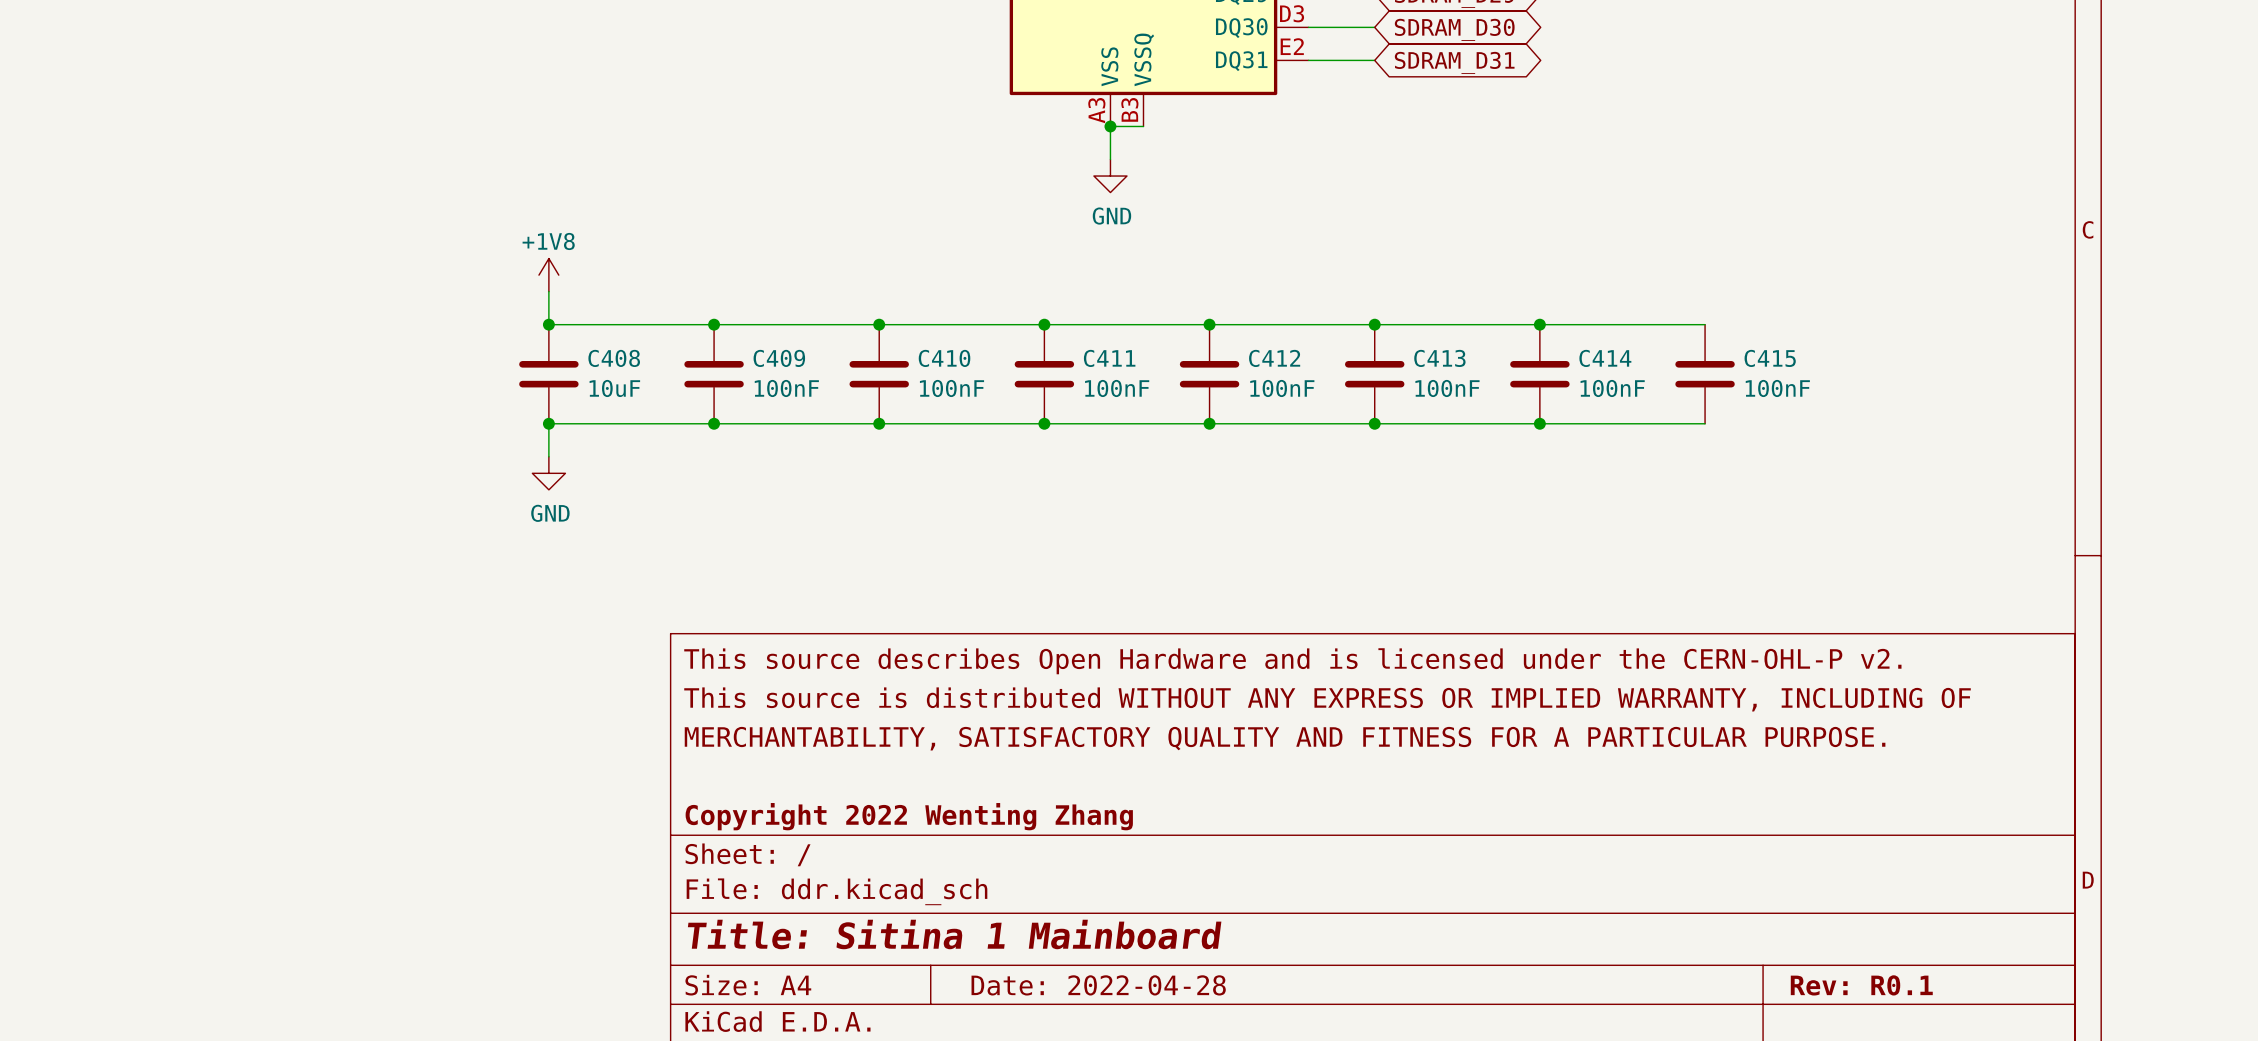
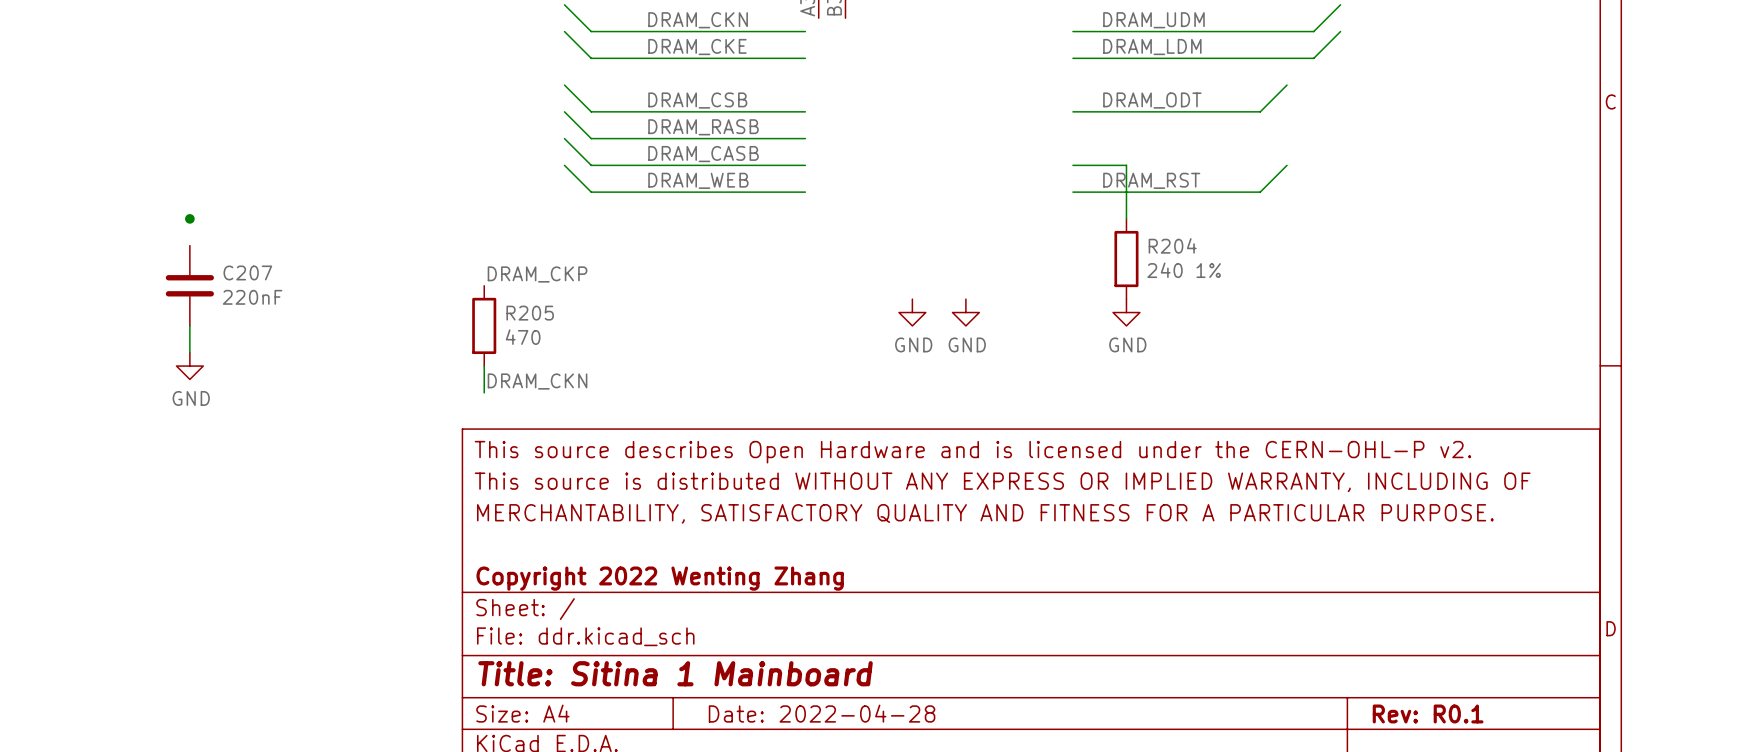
wire: none -> (564, 4) (591, 31) (805, 31)
wire: none -> (1340, 4) (1313, 31) (1072, 31)
junction: (1110, 126) -> none
wire: (1143, 126) (1110, 126) (1110, 159) -> none
label: none -> DRAM_CKN (698, 20)
label: none -> DRAM_UDM (1153, 20)
wire: none -> (564, 31) (591, 58) (805, 58)
wire: none -> (1340, 31) (1313, 58) (1072, 58)
label: none -> DRAM_CKE (697, 47)
label: none -> DRAM_LDM (1152, 47)
power symbol: GND (1110, 176) -> none
wire: none -> (564, 85) (591, 111) (805, 111)
wire: none -> (1287, 85) (1260, 111) (1072, 111)
label: none -> DRAM_CSB (697, 100)
label: none -> DRAM_ODT (1152, 100)
wire: none -> (564, 111) (591, 138) (805, 138)
label: none -> DRAM_RASB (703, 127)
power symbol: +1V8 (548, 275) -> none
wire: none -> (564, 138) (591, 165) (805, 165)
wire: (548, 291) (548, 324) (1705, 324) -> none
label: none -> DRAM_CASB (703, 154)
wire: none -> (564, 165) (591, 192) (805, 192)
wire: none -> (1072, 165) (1126, 165) (1126, 218)
wire: none -> (1287, 165) (1260, 192) (1072, 192)
junction: (548, 324) -> none
junction: (714, 324) -> none
junction: (879, 324) -> none
junction: (1044, 324) -> none
junction: (1209, 324) -> none
junction: (1374, 324) -> none
junction: (1539, 324) -> none
label: none -> DRAM_RST (1151, 180)
label: none -> DRAM_WEB (698, 180)
junction: none -> (189, 218)
C408: 10uF (548, 374) -> none
C409: 100nF (714, 374) -> none
C410: 100nF (879, 374) -> none
C411: 100nF (1044, 374) -> none
C412: 100nF (1209, 374) -> none
C413: 100nF (1374, 374) -> none
C414: 100nF (1539, 374) -> none
C415: 100nF (1705, 374) -> none
junction: (548, 423) -> none
junction: (714, 423) -> none
junction: (879, 423) -> none
junction: (1044, 423) -> none
junction: (1209, 423) -> none
junction: (1374, 423) -> none
R204: none -> 240 1% (1126, 259)
junction: (1539, 423) -> none
wire: (1705, 423) (548, 423) (548, 456) -> none
label: none -> DRAM_CKP (537, 274)
C207: none -> 220nF (189, 285)
power symbol position: GND (548, 473) -> GND (189, 366)
power symbol: none -> GND (912, 312)
power symbol: none -> GND (965, 312)
power symbol: none -> GND (1126, 312)
wire: none -> (189, 325) (189, 352)
R205: none -> 470 (484, 325)
wire: none -> (484, 366) (484, 392)
label: none -> DRAM_CKN (537, 381)

